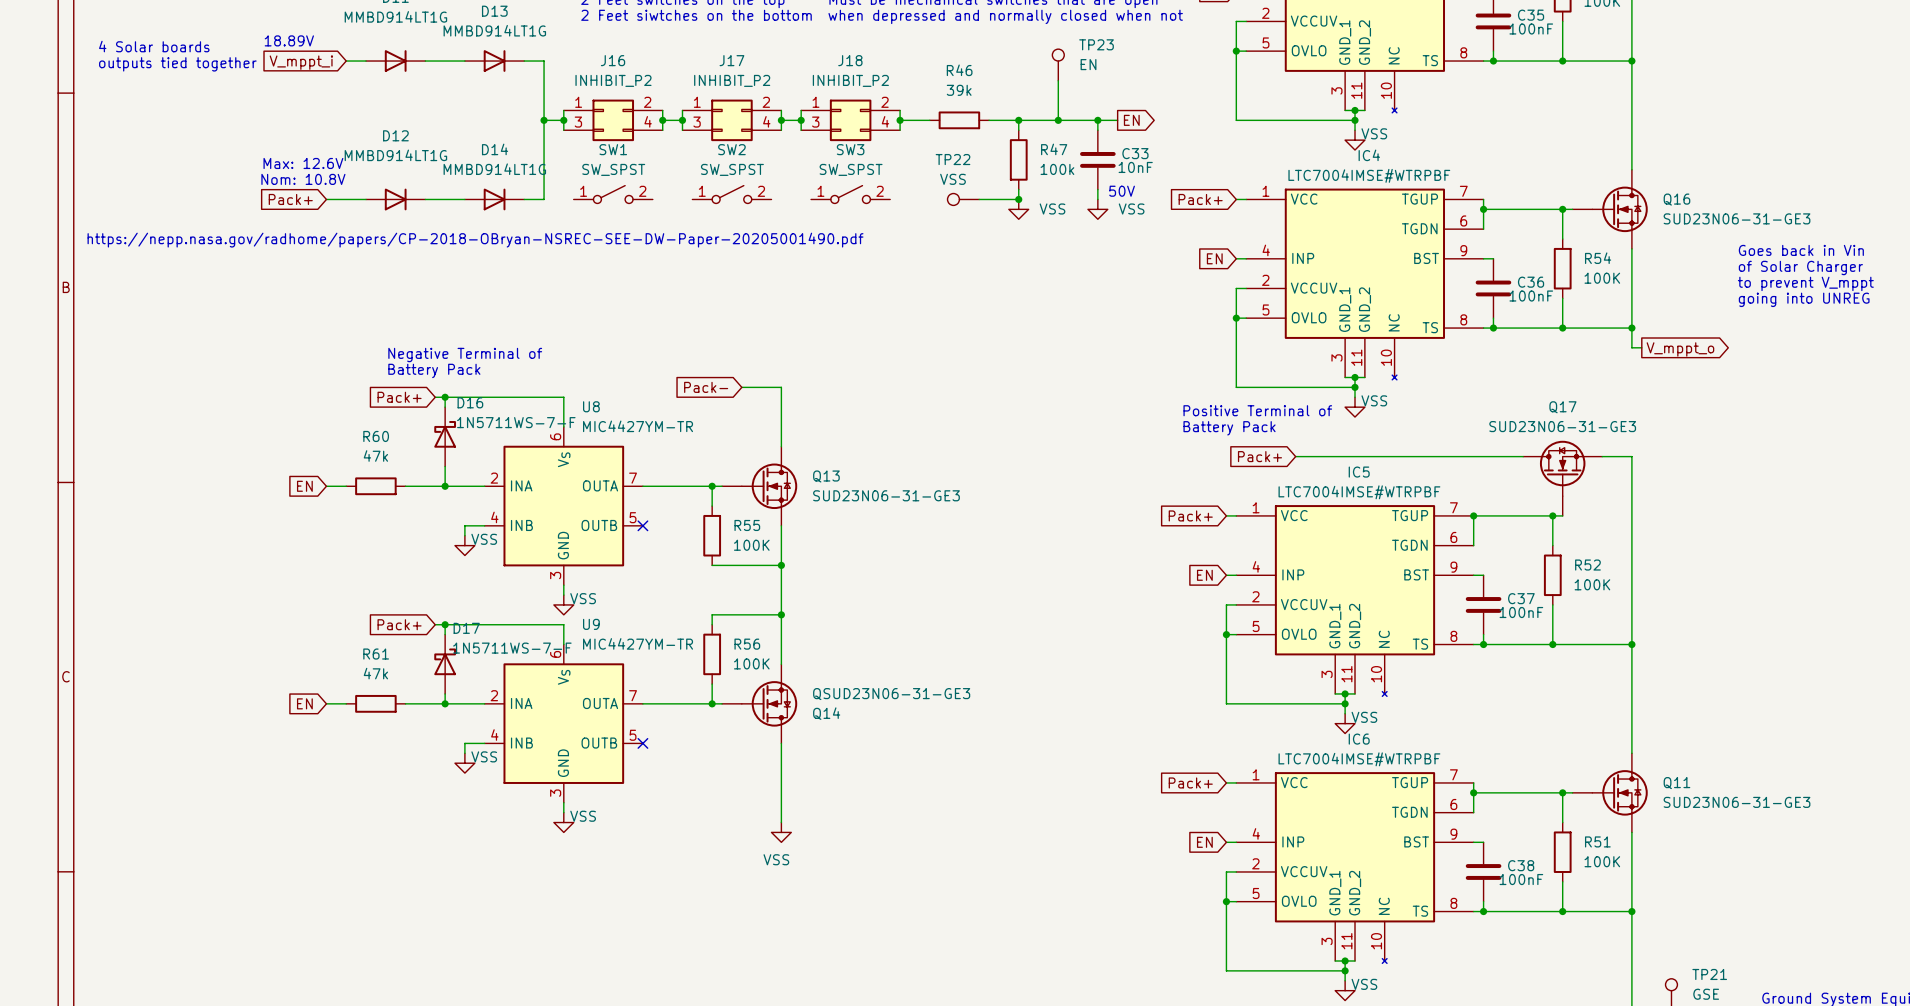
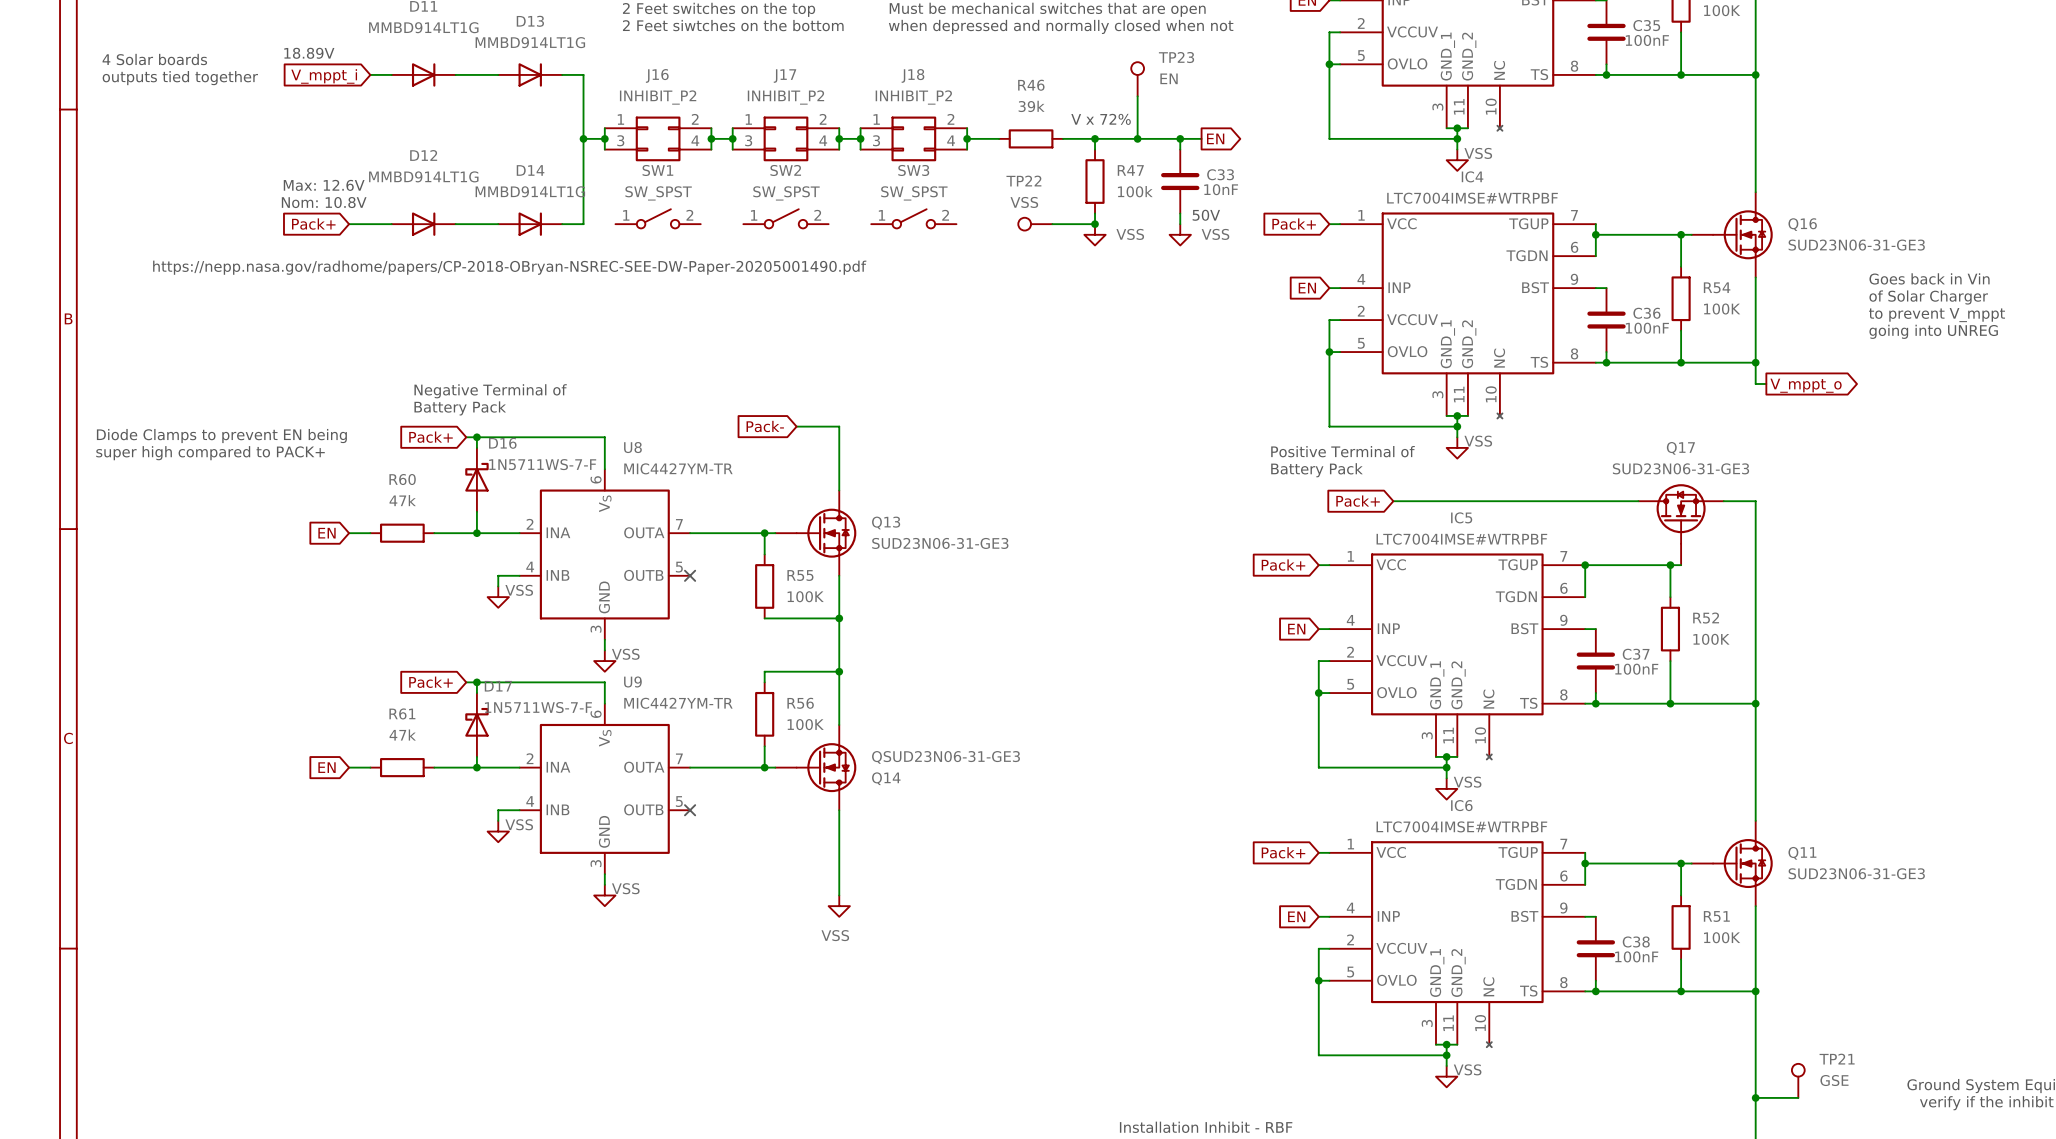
text: none -> V x 72% (1101, 119)
text: none -> Diode Clamps to prevent EN being (221, 436)
text: none -> super high compared to PACK+ (210, 453)

